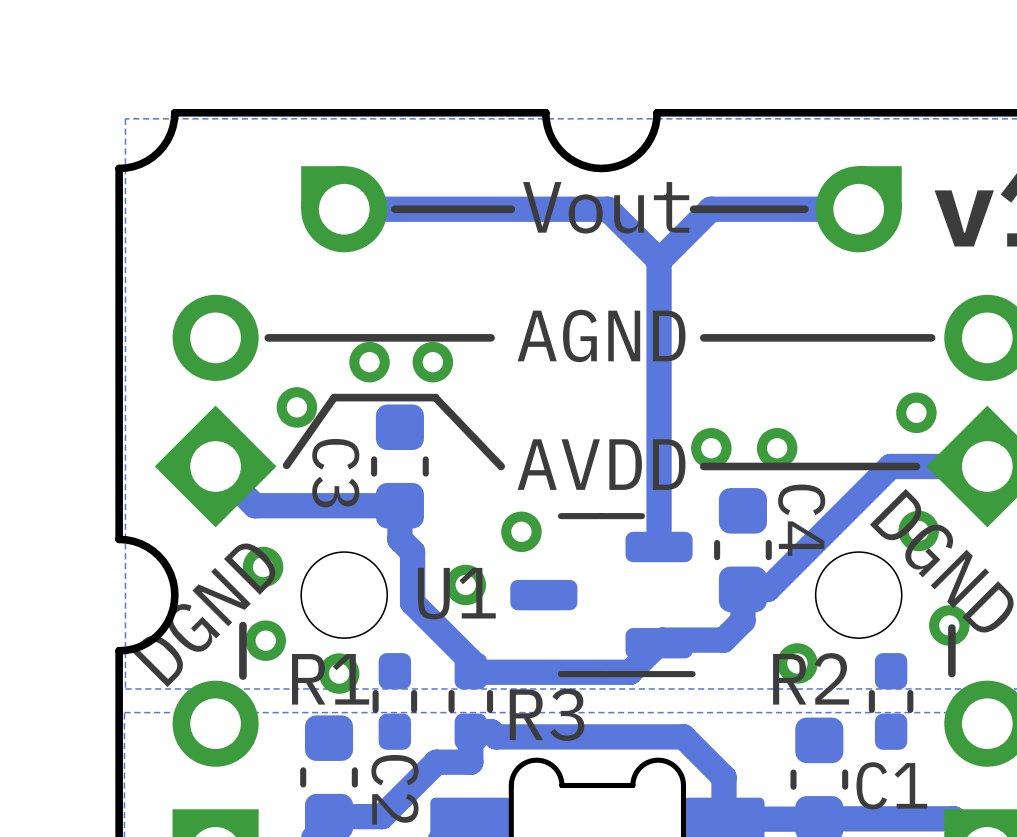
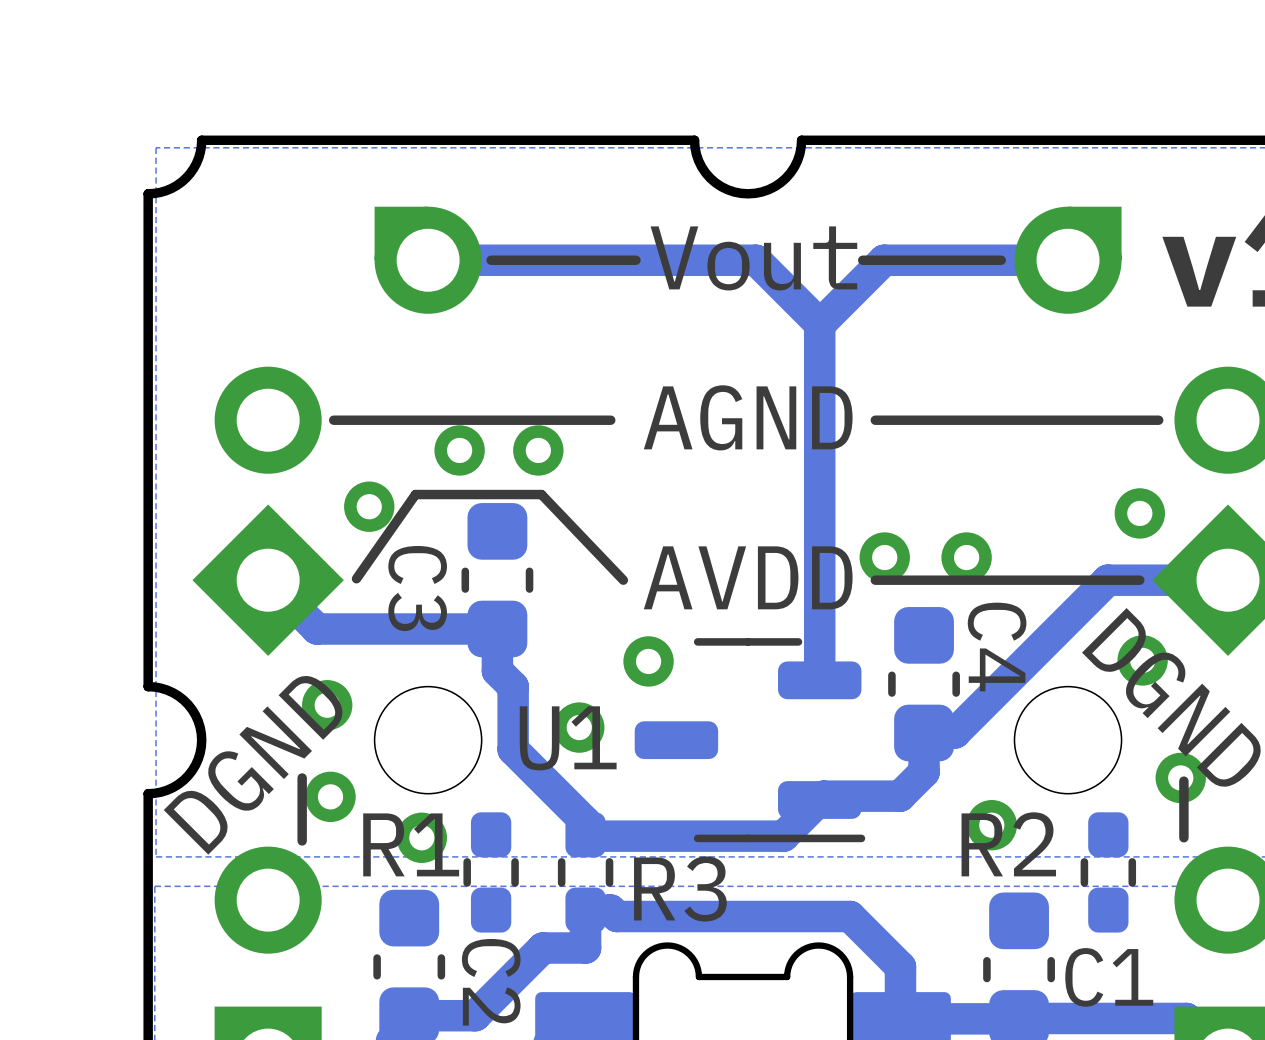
board edge: (174, 112) (170, 134) (158, 152) (140, 164) (119, 168) -> (217, 140) (201, 140) (196, 163) (181, 182) (165, 190) (148, 193) (148, 209)
board edge: (657, 112) (655, 126) (650, 138) (638, 154) (621, 164) (601, 168) (581, 164) (564, 154) (555, 144) (549, 132) (545, 112) -> (817, 140) (801, 140) (797, 160) (790, 172) (780, 182) (768, 189) (748, 193) (727, 189) (715, 182) (701, 167) (696, 154) (694, 140) (678, 140)
board edge: (119, 539) (140, 543) (158, 555) (170, 573) (174, 595) (170, 616) (158, 634) (140, 646) (119, 650) -> (148, 670) (148, 686) (160, 688) (173, 692) (183, 700) (192, 709) (198, 721) (201, 740) (198, 759) (192, 770) (183, 780) (173, 787) (160, 792) (148, 793) (148, 809)

